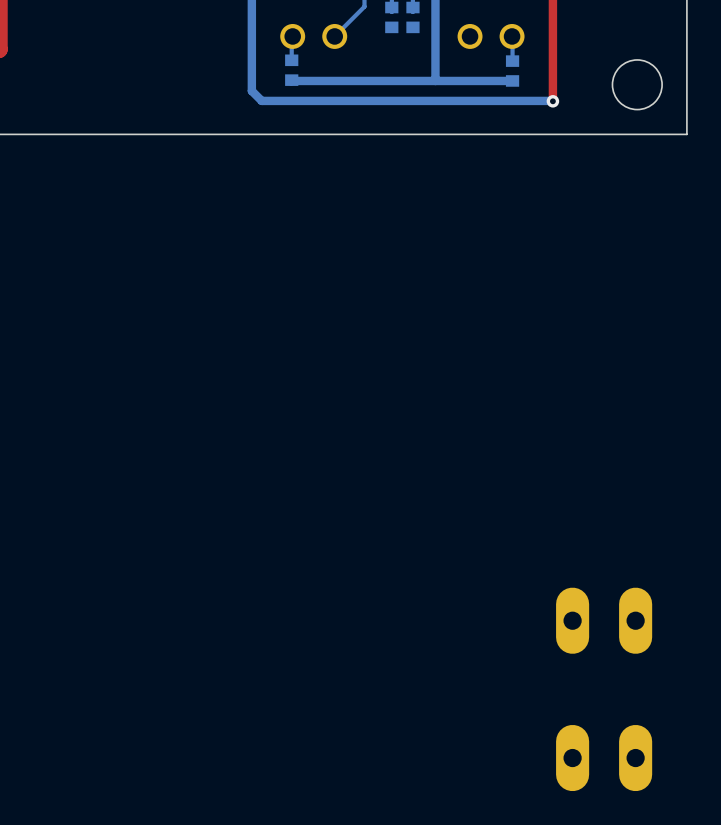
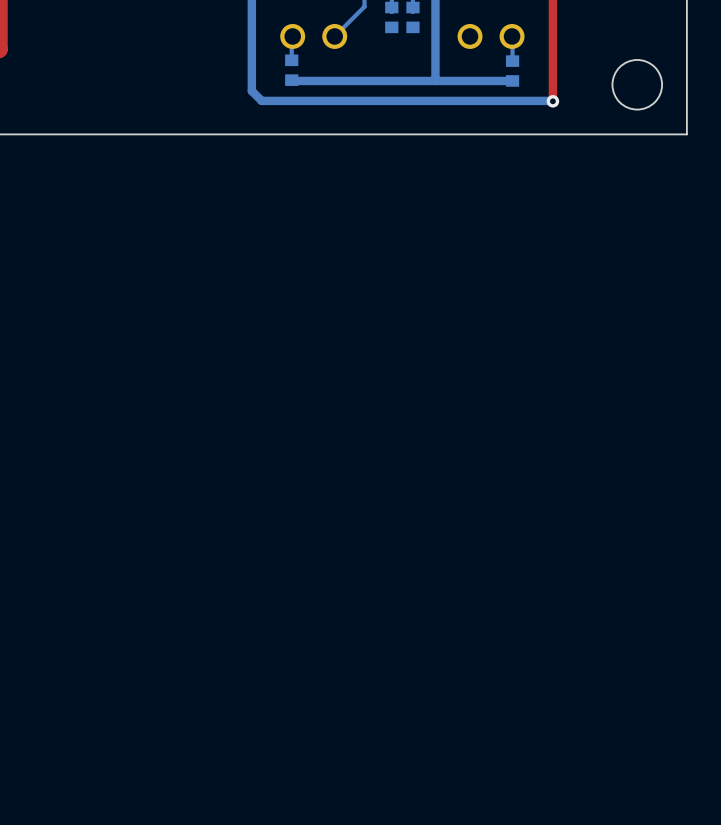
part: (604, 620) -> none
part: (604, 758) -> none

